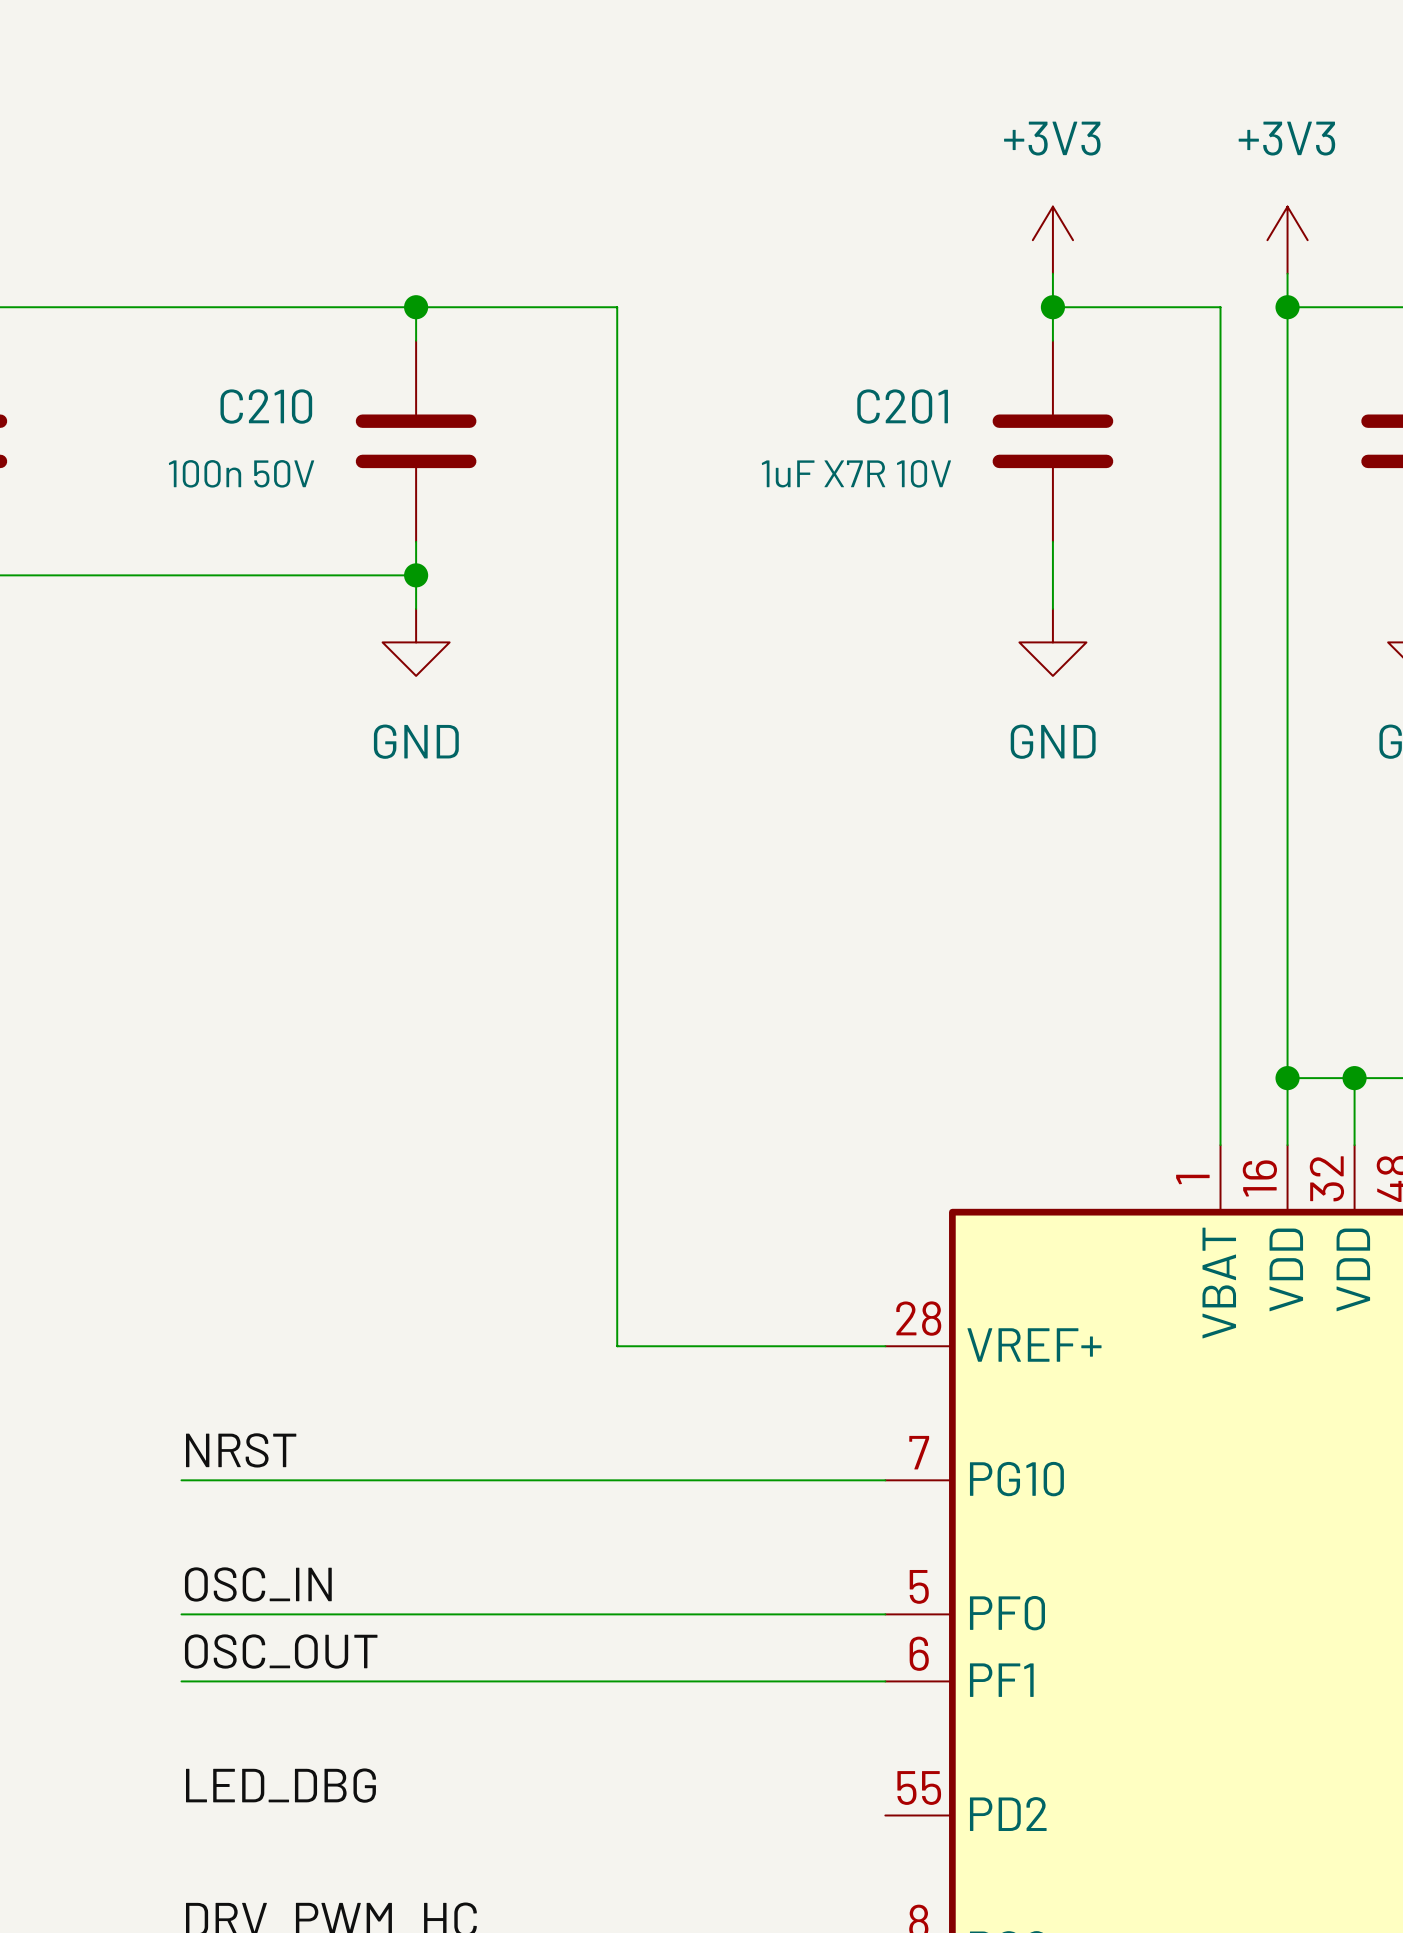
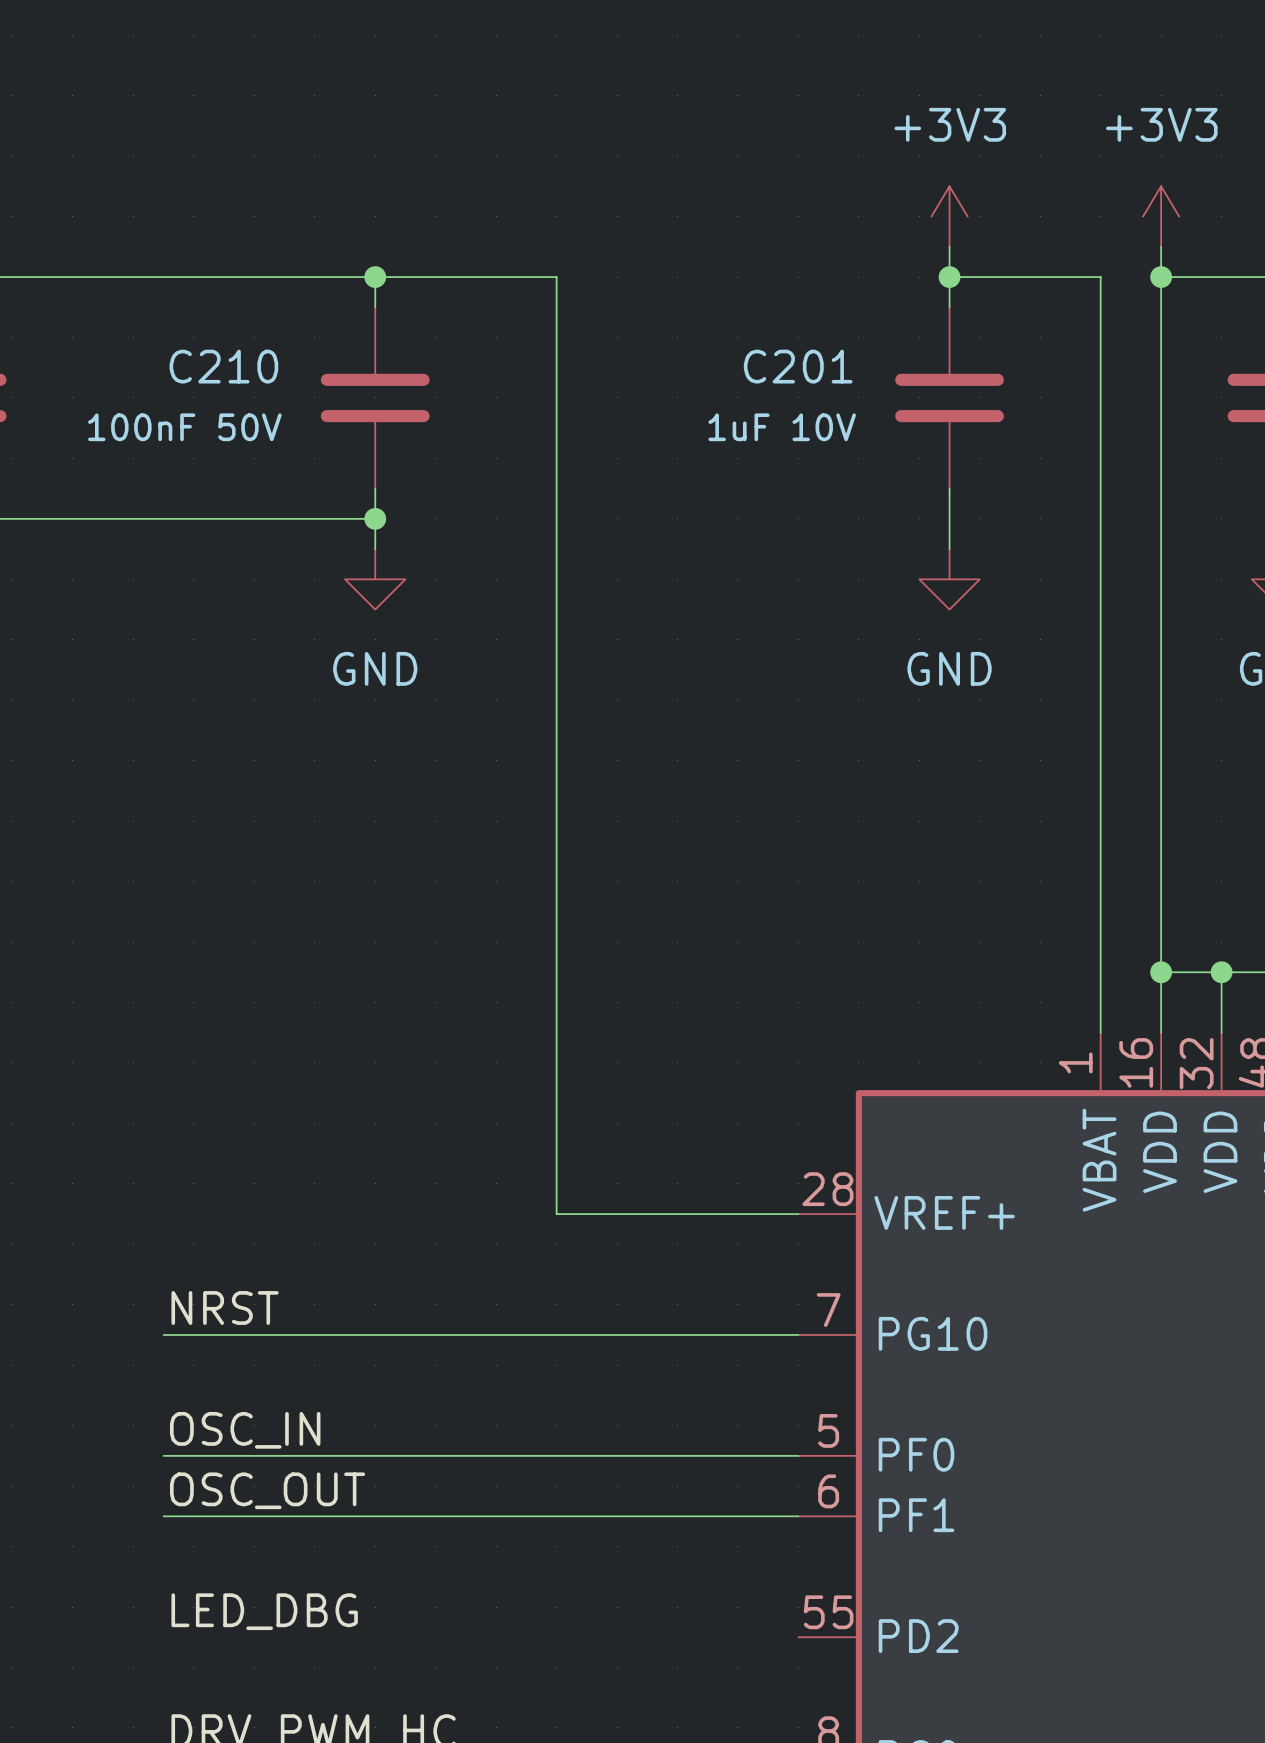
C210 value: 100n 50V (241, 473) -> 100nF 50V (184, 427)
C201 value: 1uF X7R 10V (856, 473) -> 1uF 10V (782, 427)

